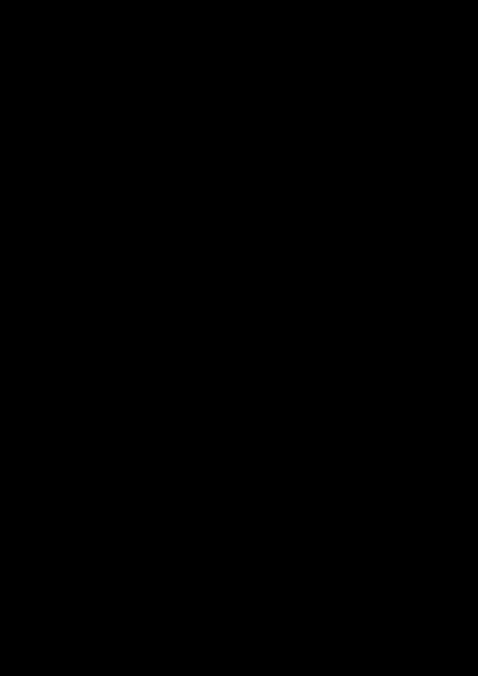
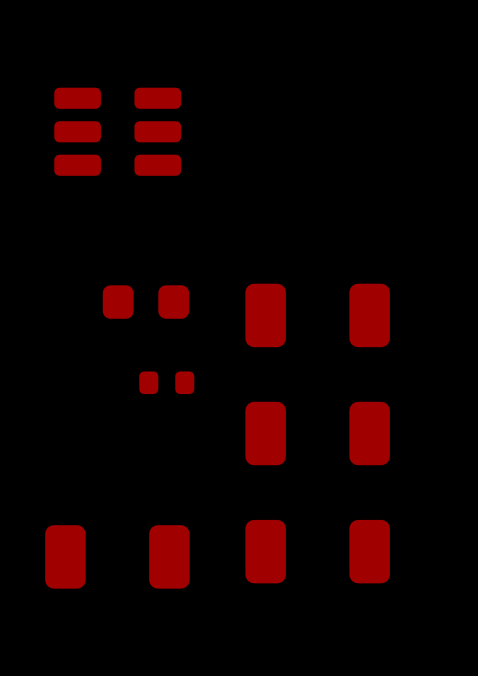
part: none -> (117, 131)
part: none -> (145, 302)
part: none -> (317, 315)
part: none -> (166, 382)
part: none -> (317, 433)
part: none -> (317, 551)
part: none -> (117, 556)

